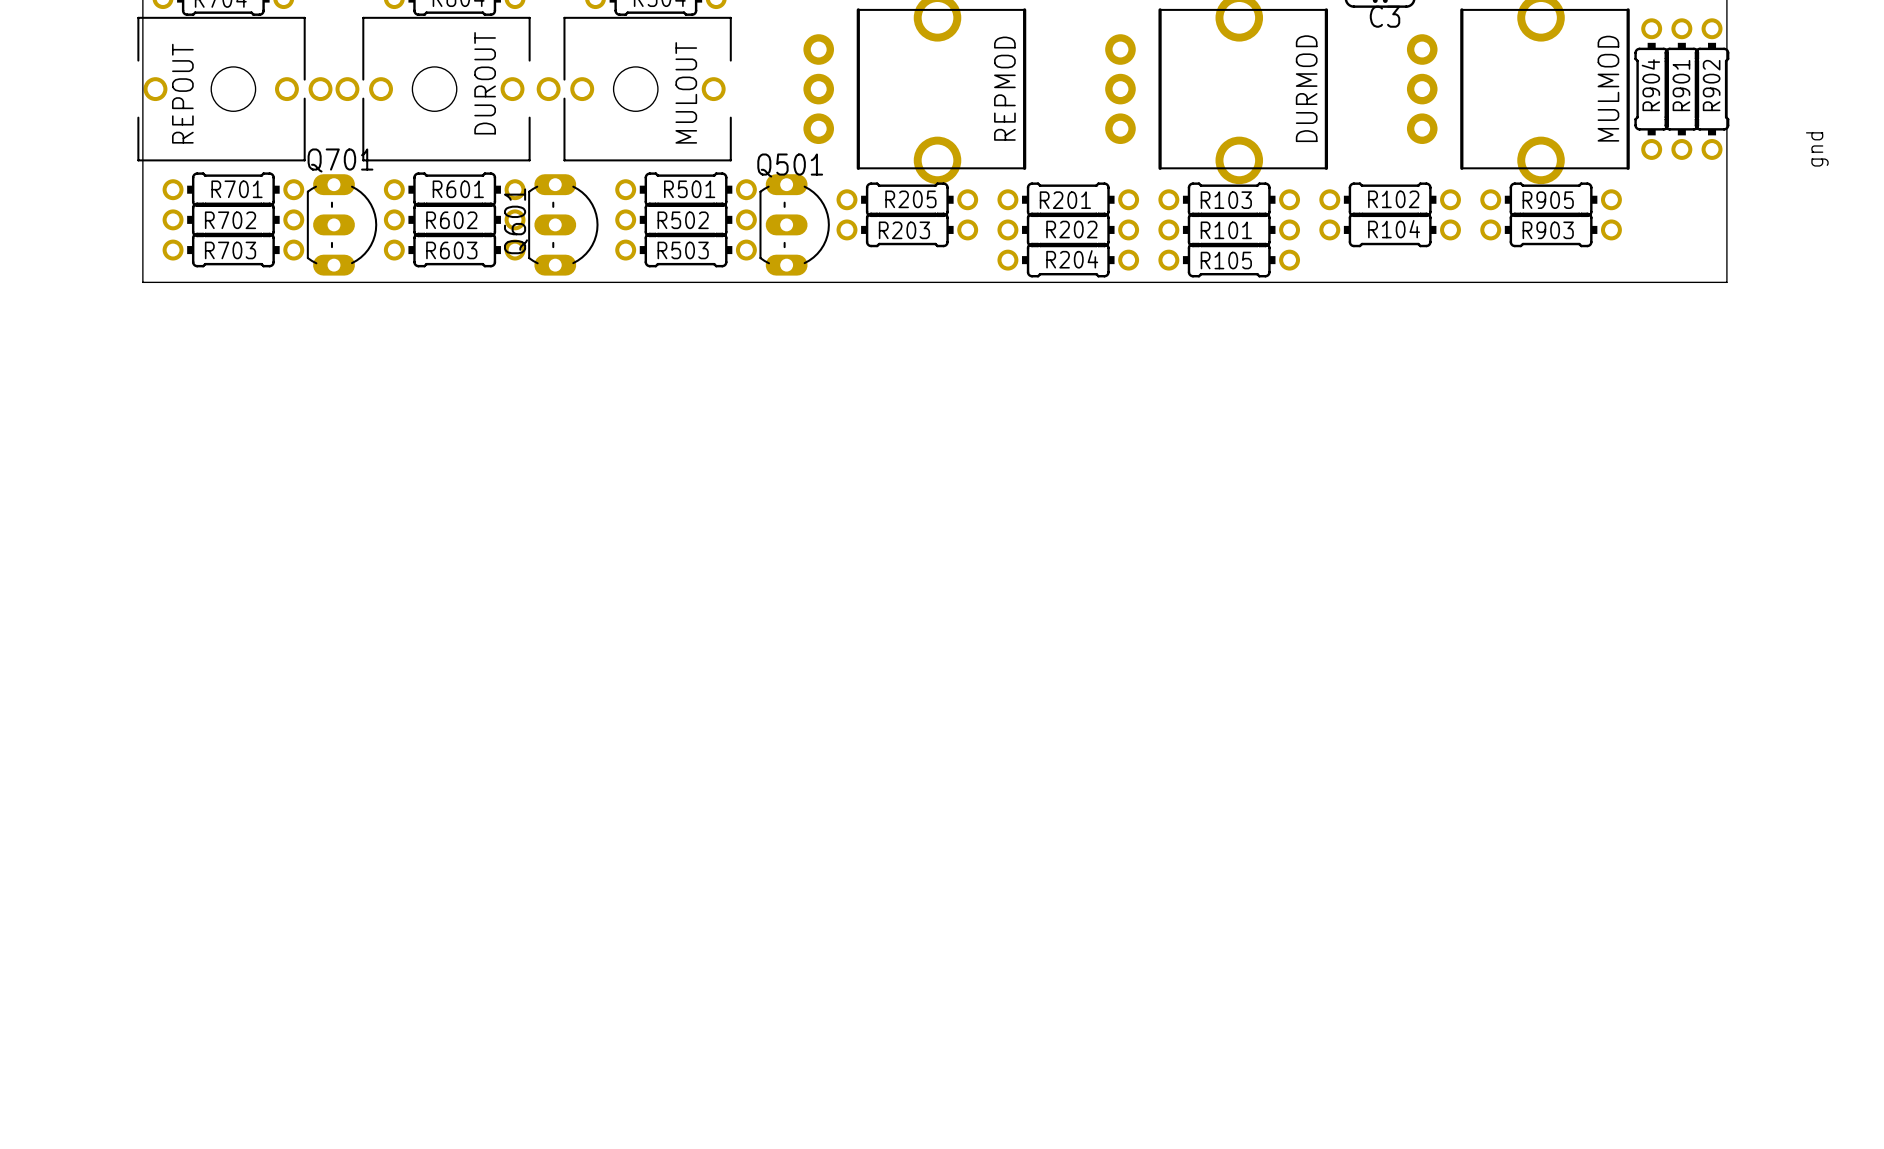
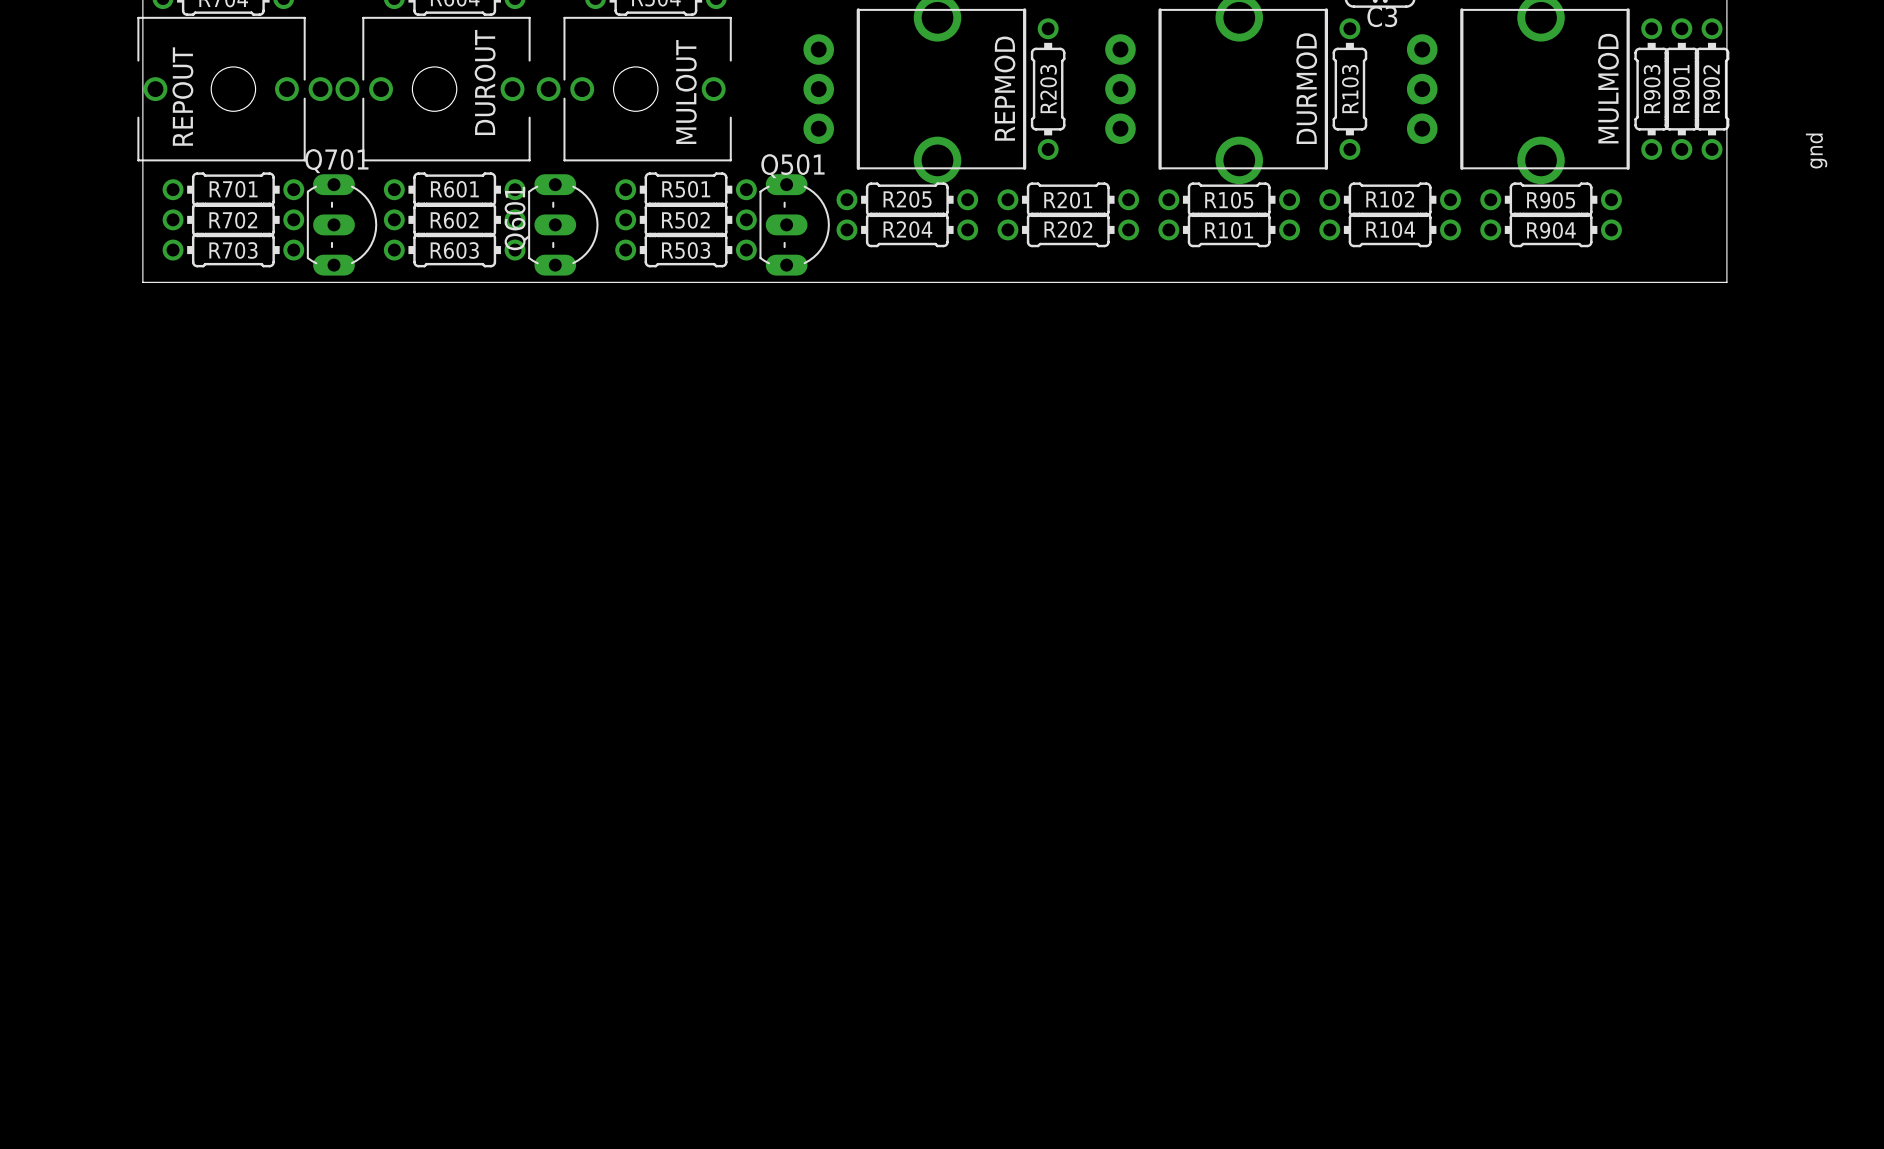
R904 name: R904 (1650, 85) -> R903 (1652, 89)
R203: none -> (1048, 89)
R103: none -> (1349, 89)
R103 name: R103 (1226, 200) -> R105 (1229, 200)
R203 name: R203 (904, 230) -> R204 (907, 229)
R903 name: R903 (1548, 230) -> R904 (1551, 230)
R204: (1068, 260) -> none
R105: (1229, 260) -> none

